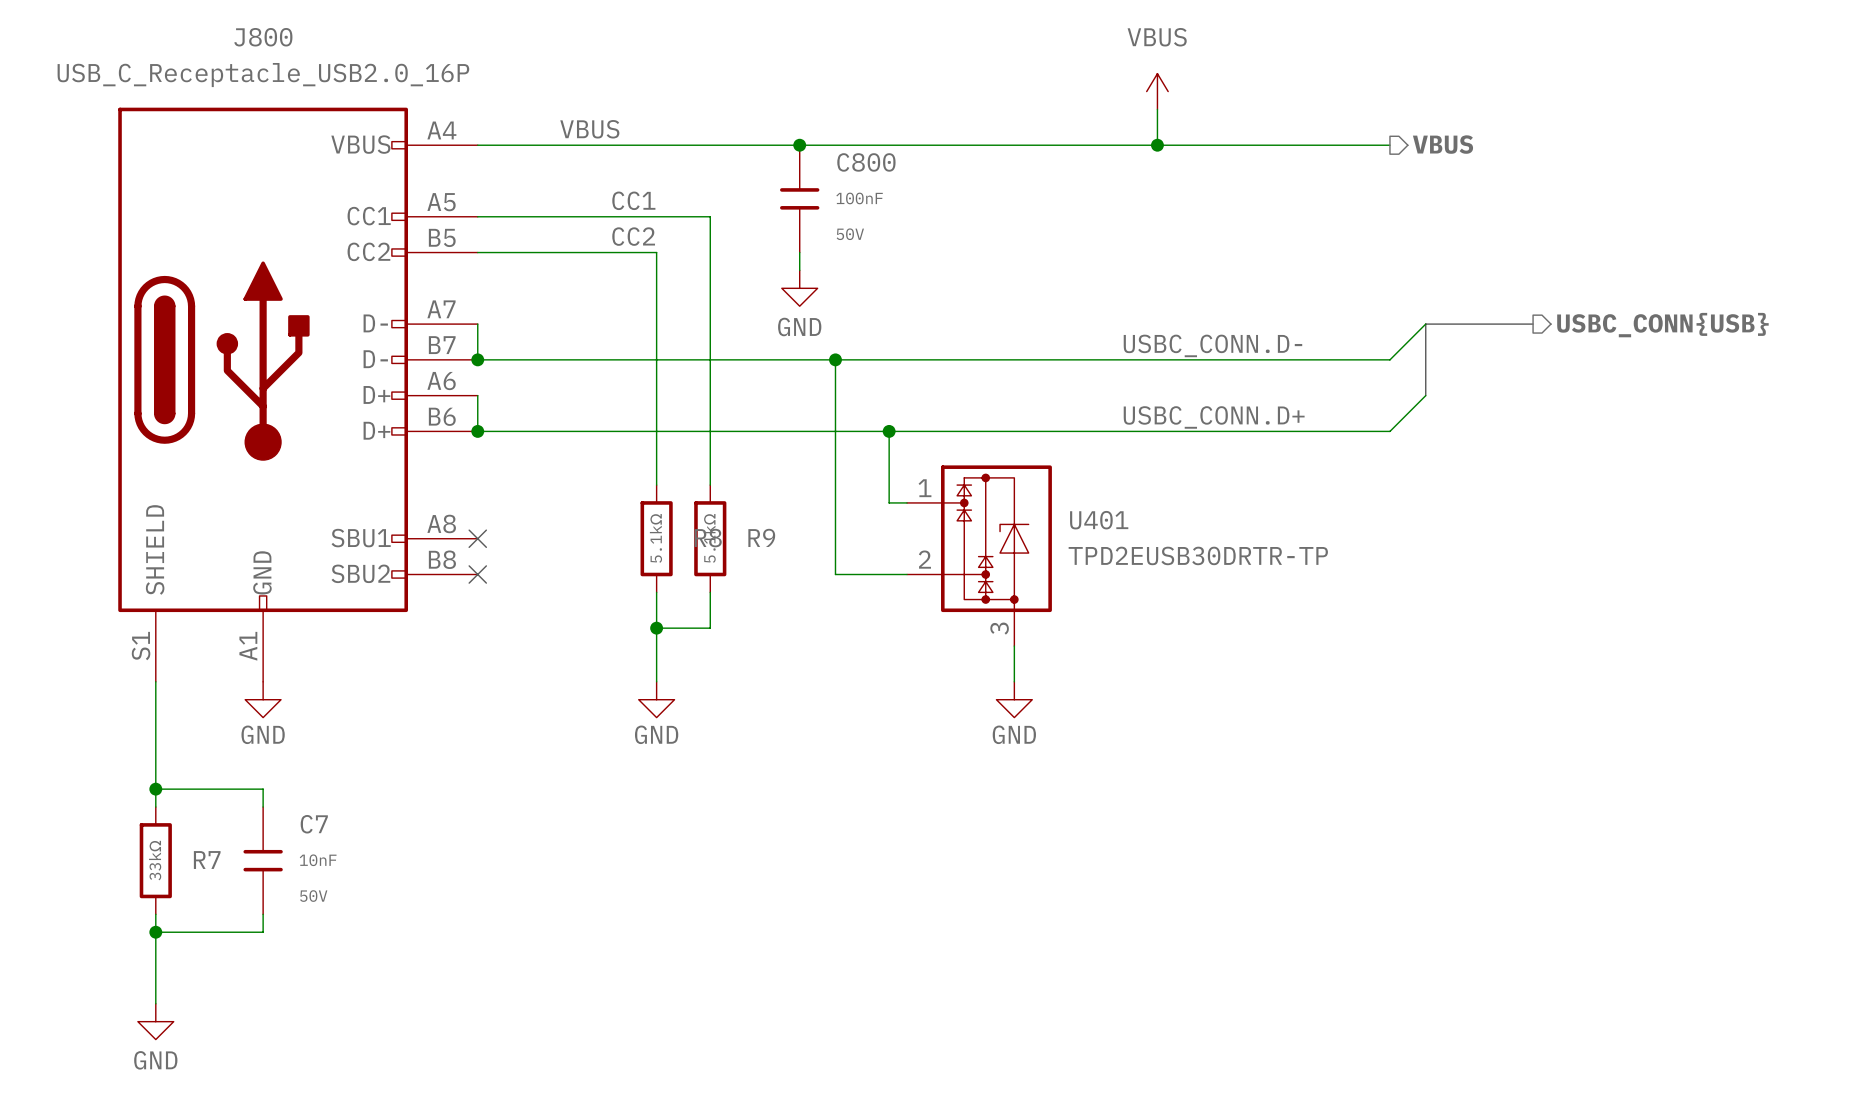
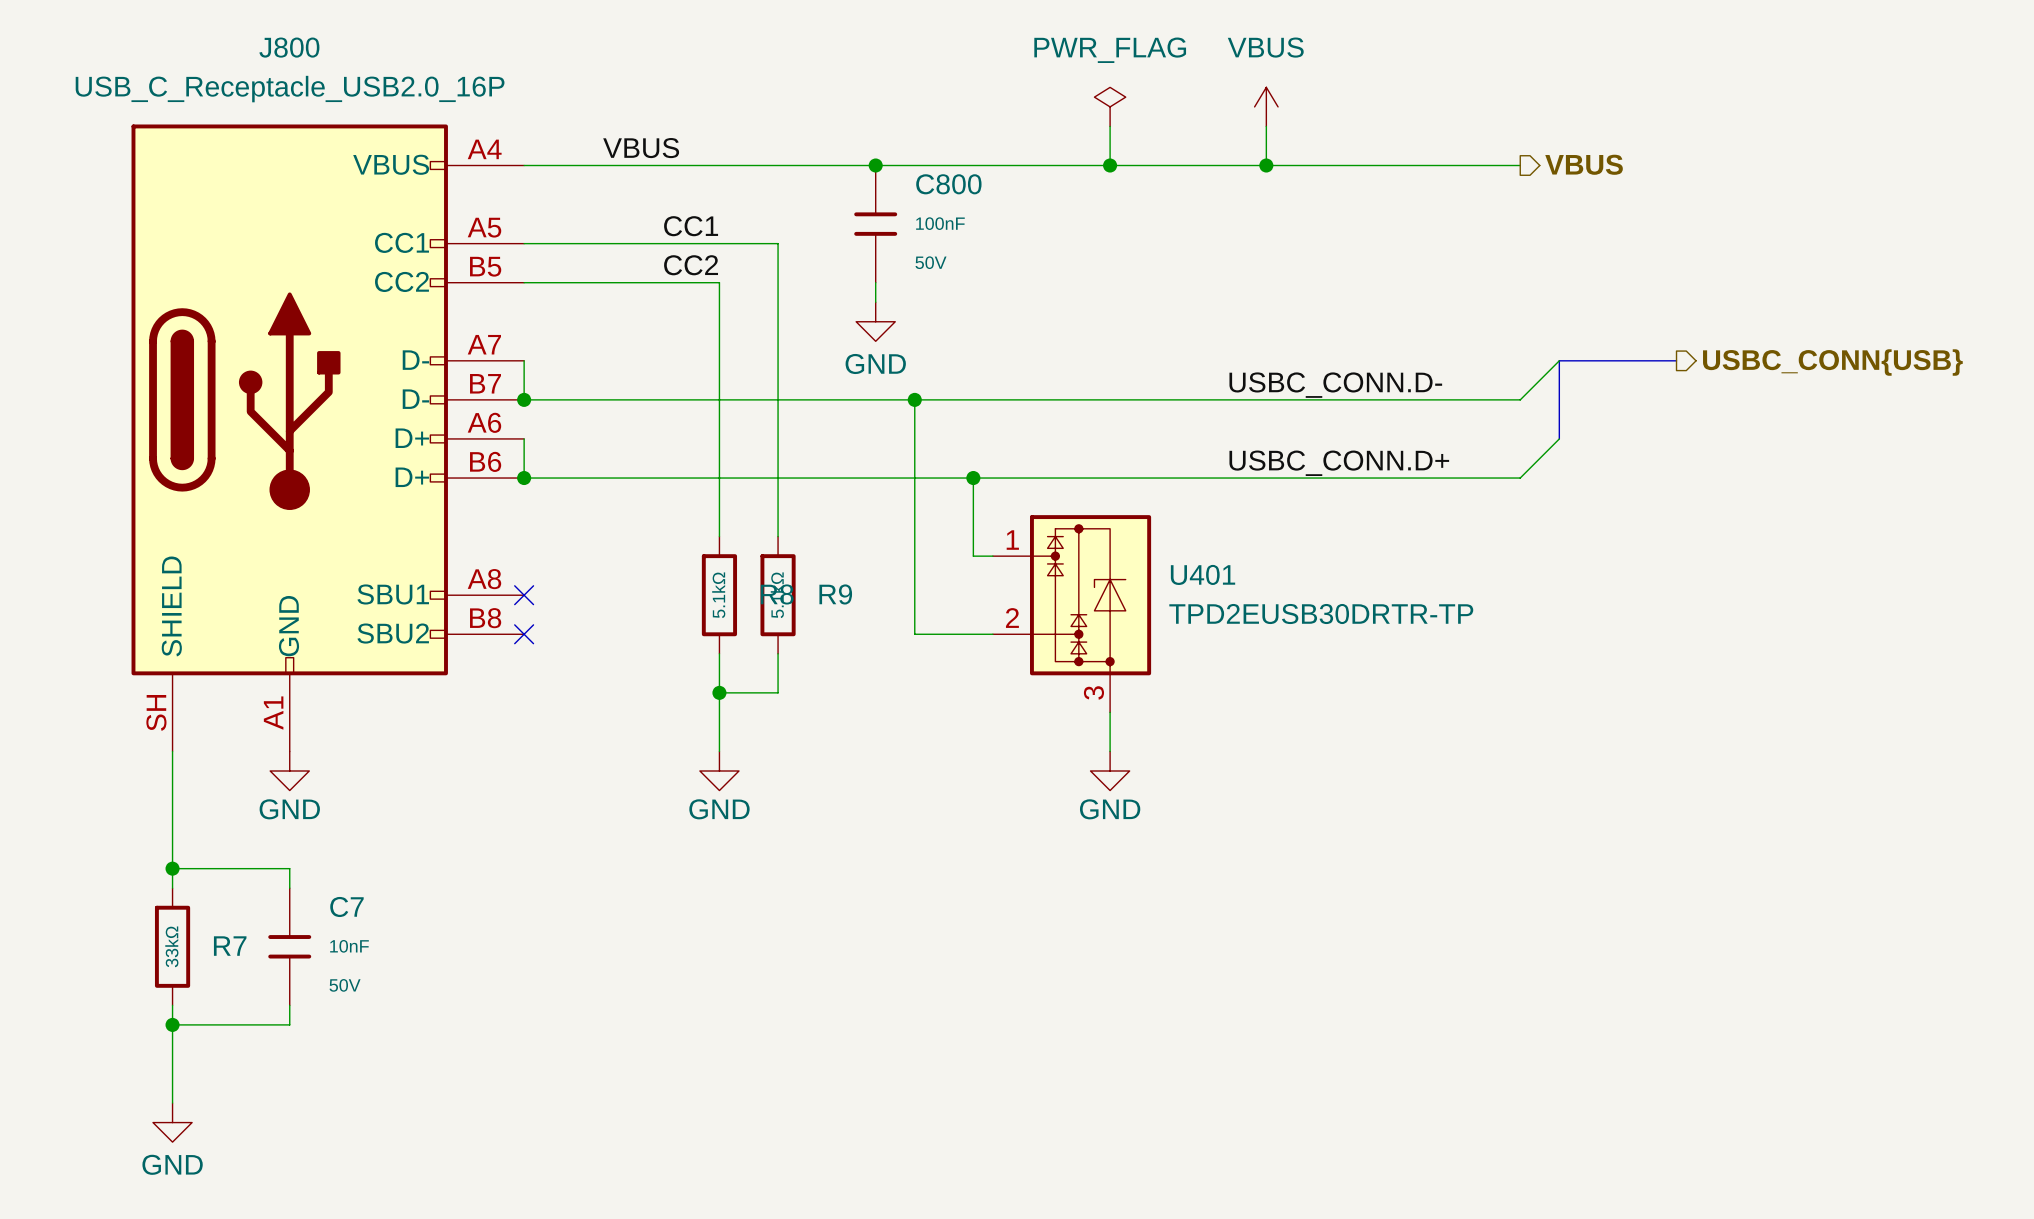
power symbol: none -> PWR_FLAG (1110, 106)
wire: none -> (1110, 126) (1110, 165)
junction: none -> (1110, 165)
J800 pin number: S1 (141, 646) -> SH (156, 712)

